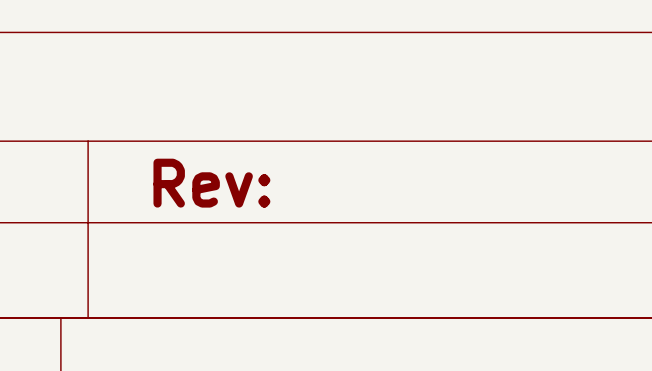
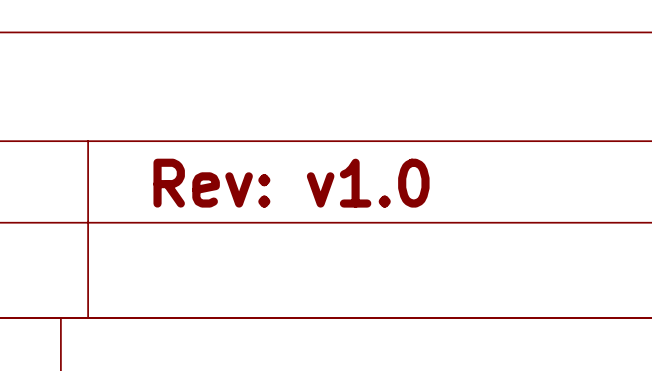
title block: Rev: (211, 183) -> Rev: v1.0 (291, 183)

